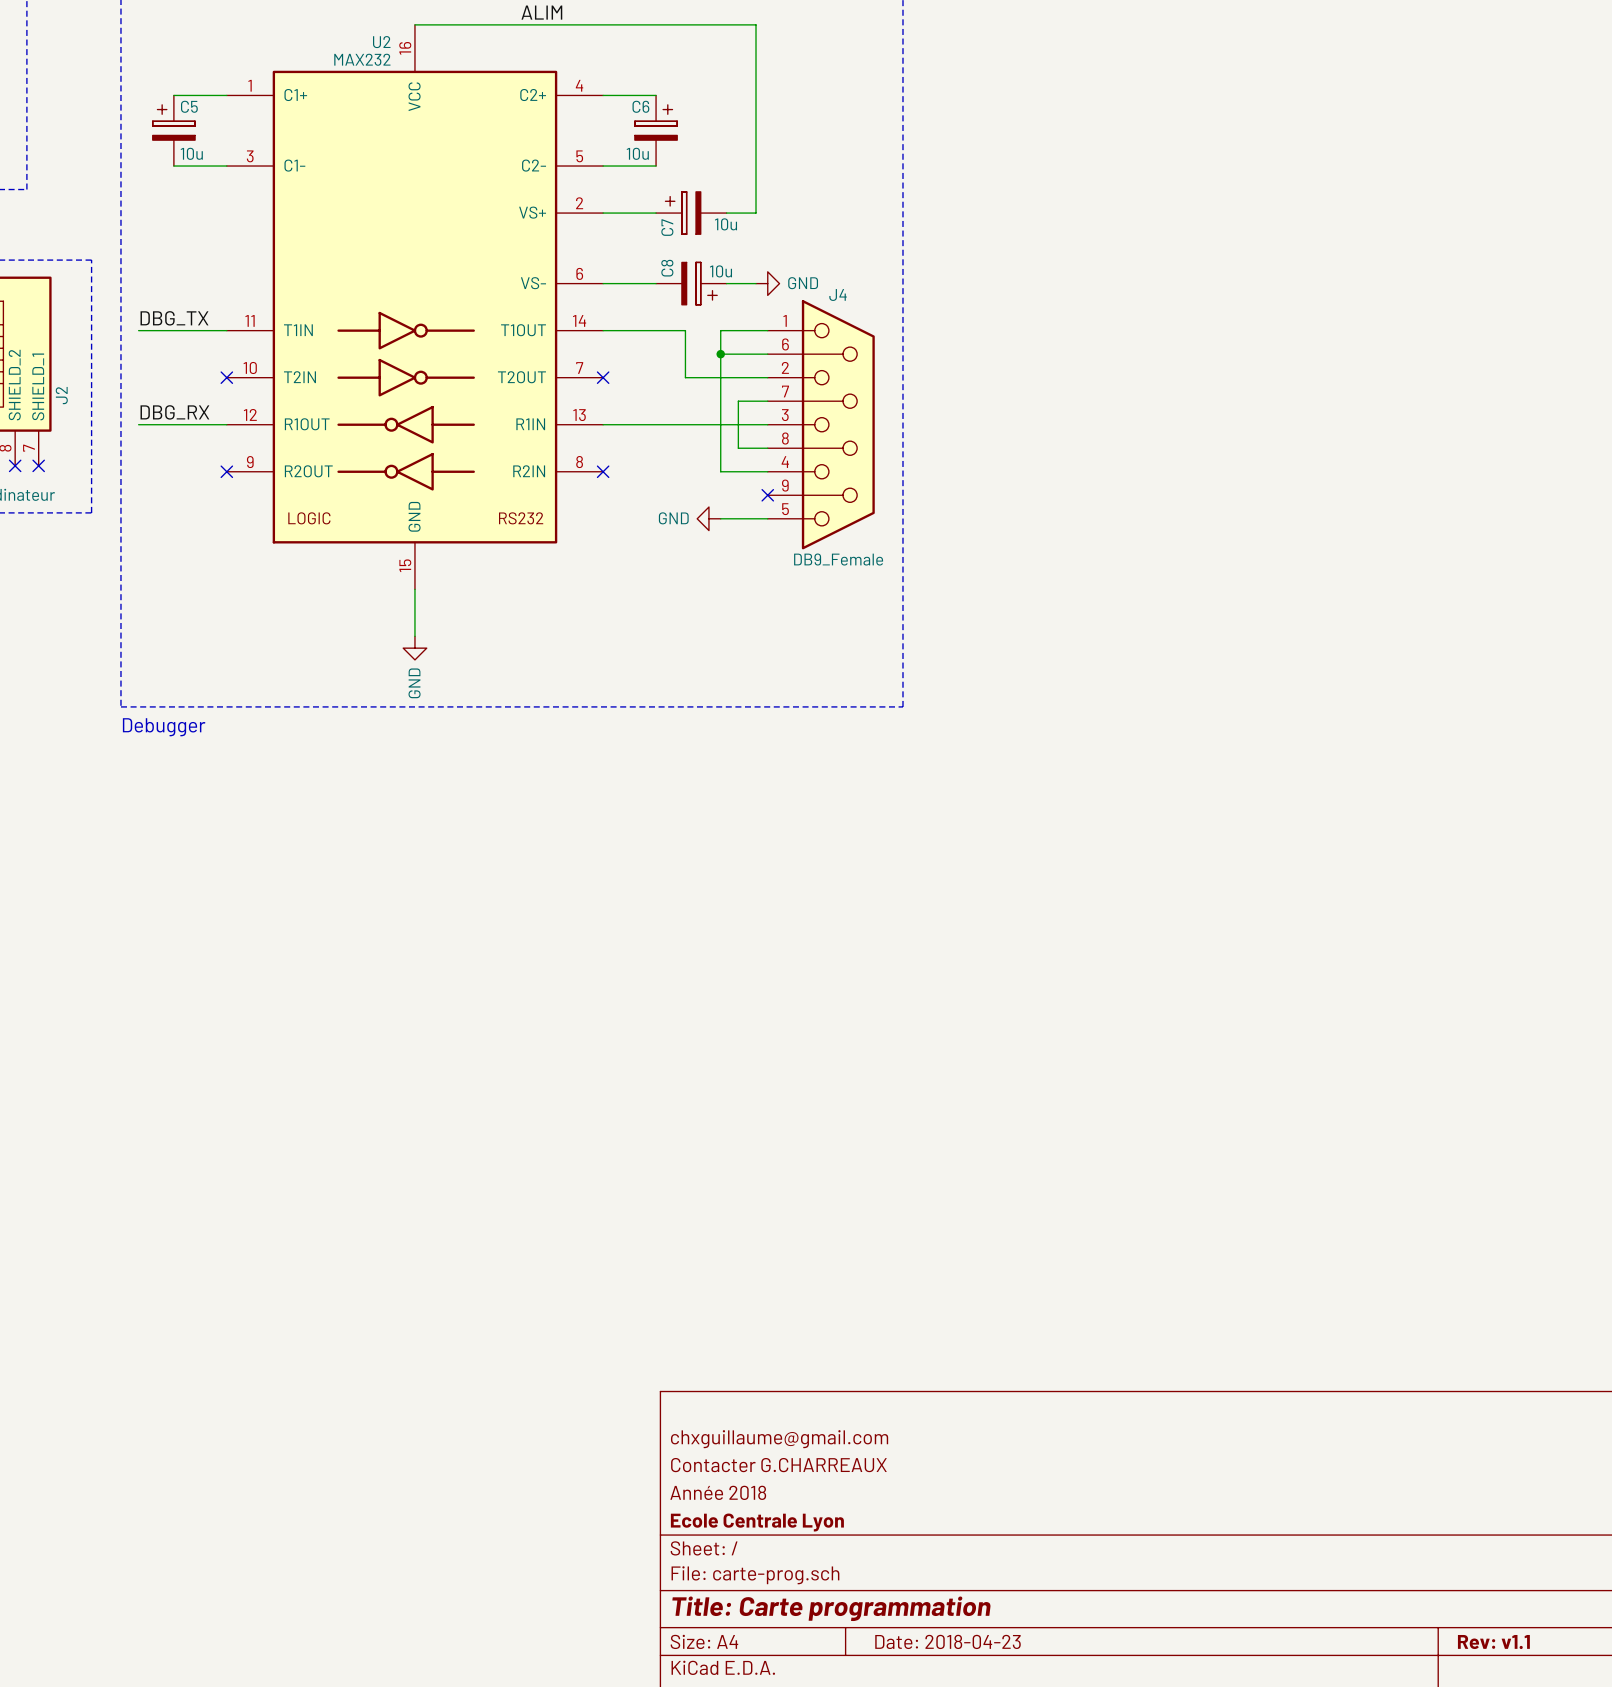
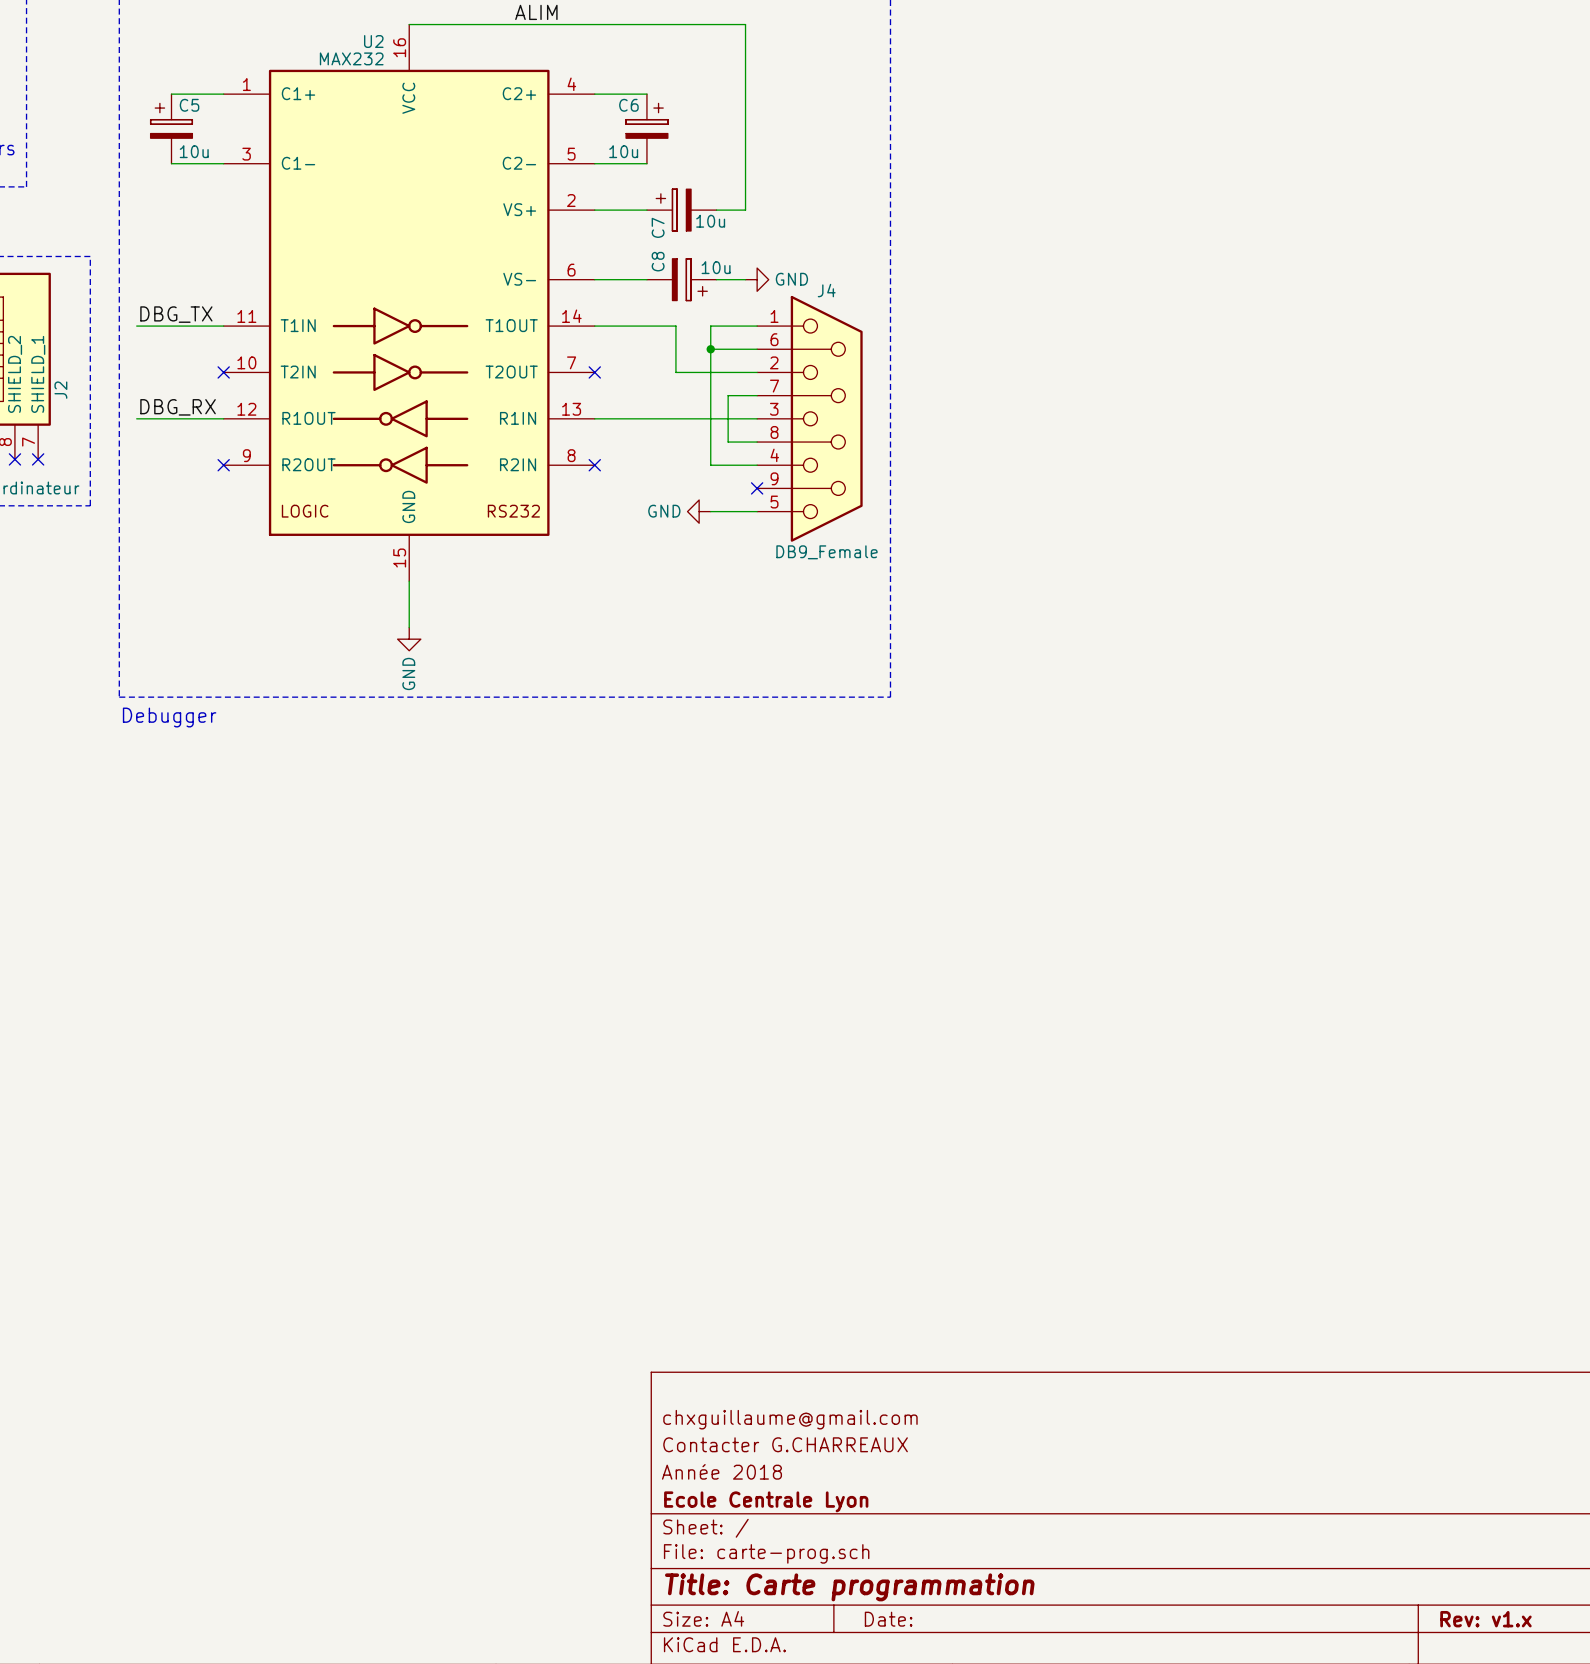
title block: Date: 2018-04-23 (948, 1641) -> Date: (888, 1619)
title block: Rev: v1.1 (1493, 1642) -> Rev: v1.x (1485, 1619)

